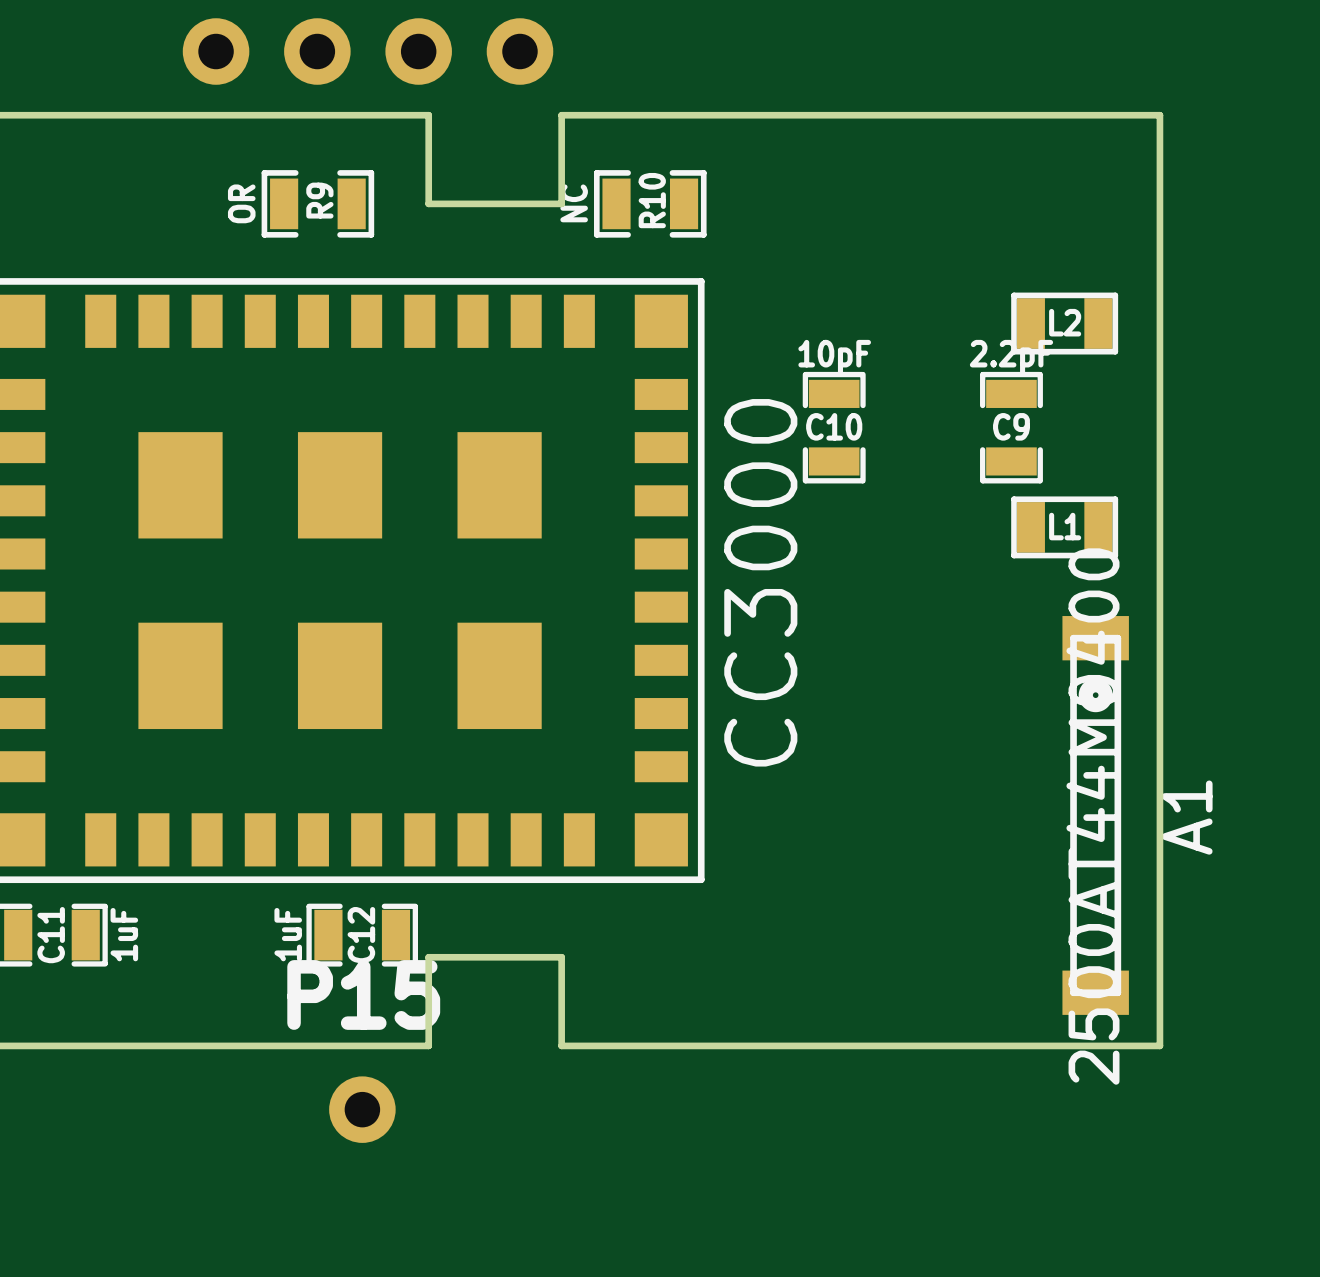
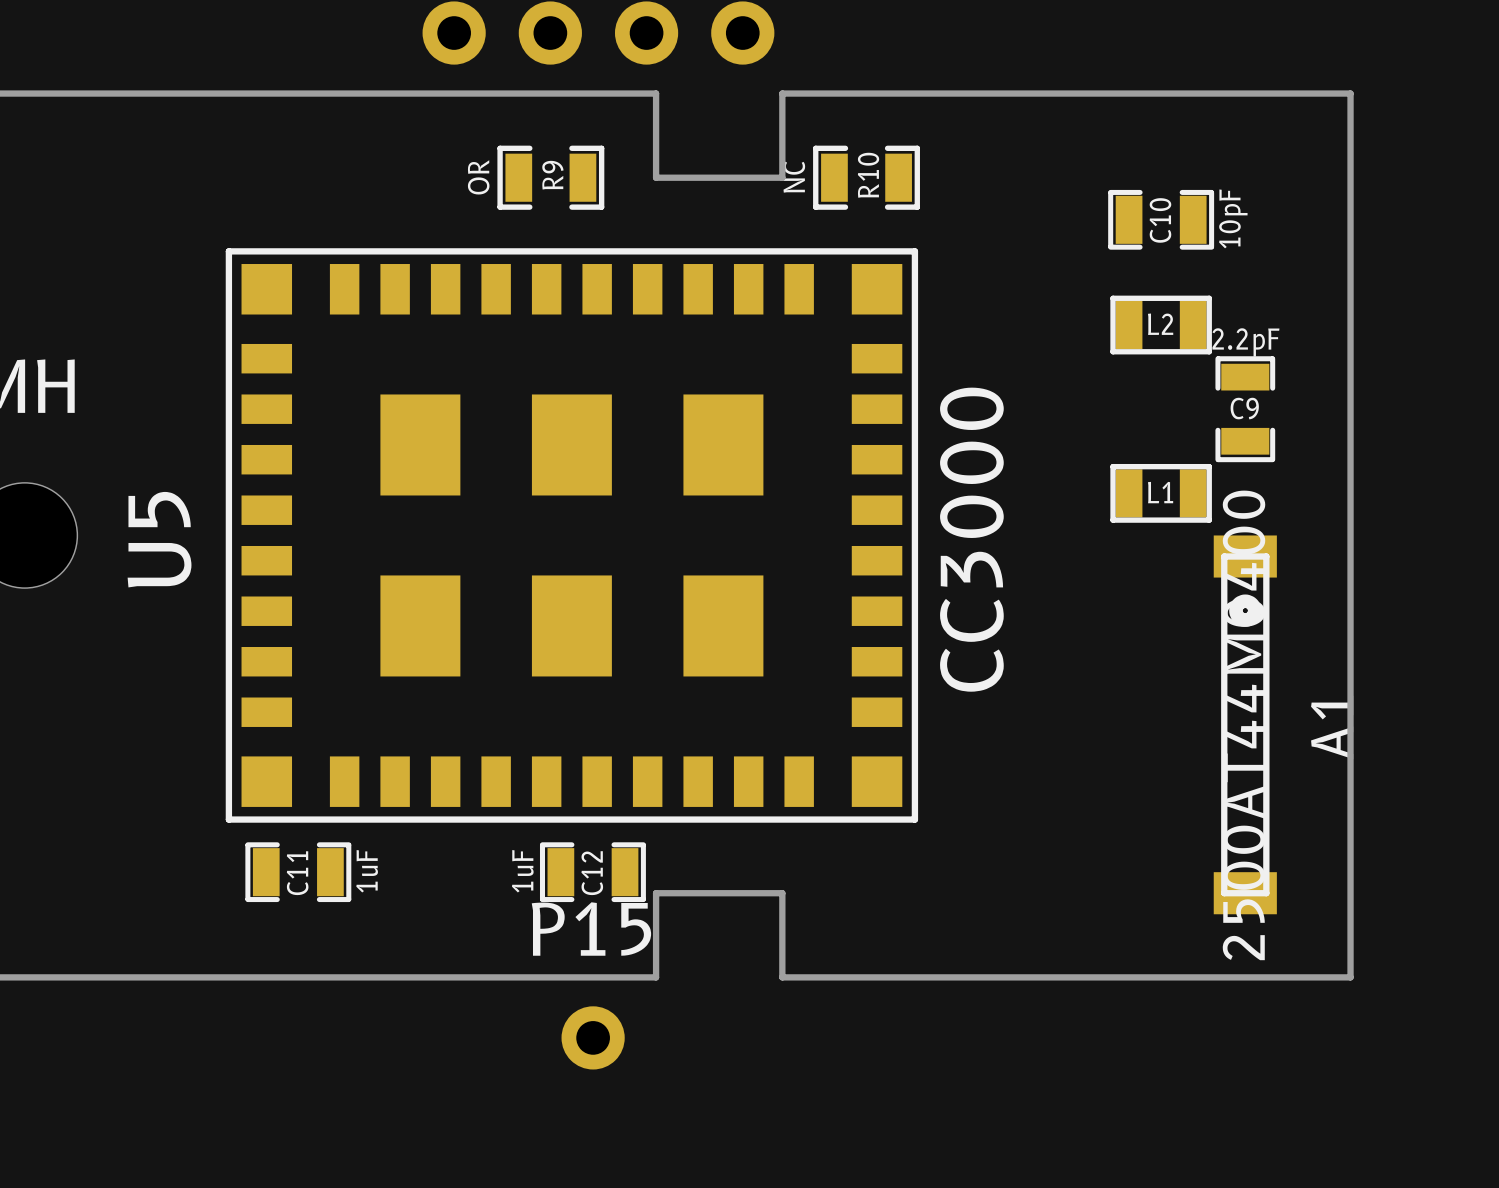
L2 position: (1064, 323) -> (1161, 325)
C10 rotation: 0° (834, 427) -> 90° clockwise (1161, 219)
C10 position: (834, 427) -> (1161, 219)
C9 position: (1011, 427) -> (1245, 409)
L1 position: (1064, 527) -> (1161, 493)
A1 position: (1095, 815) -> (1245, 724)

